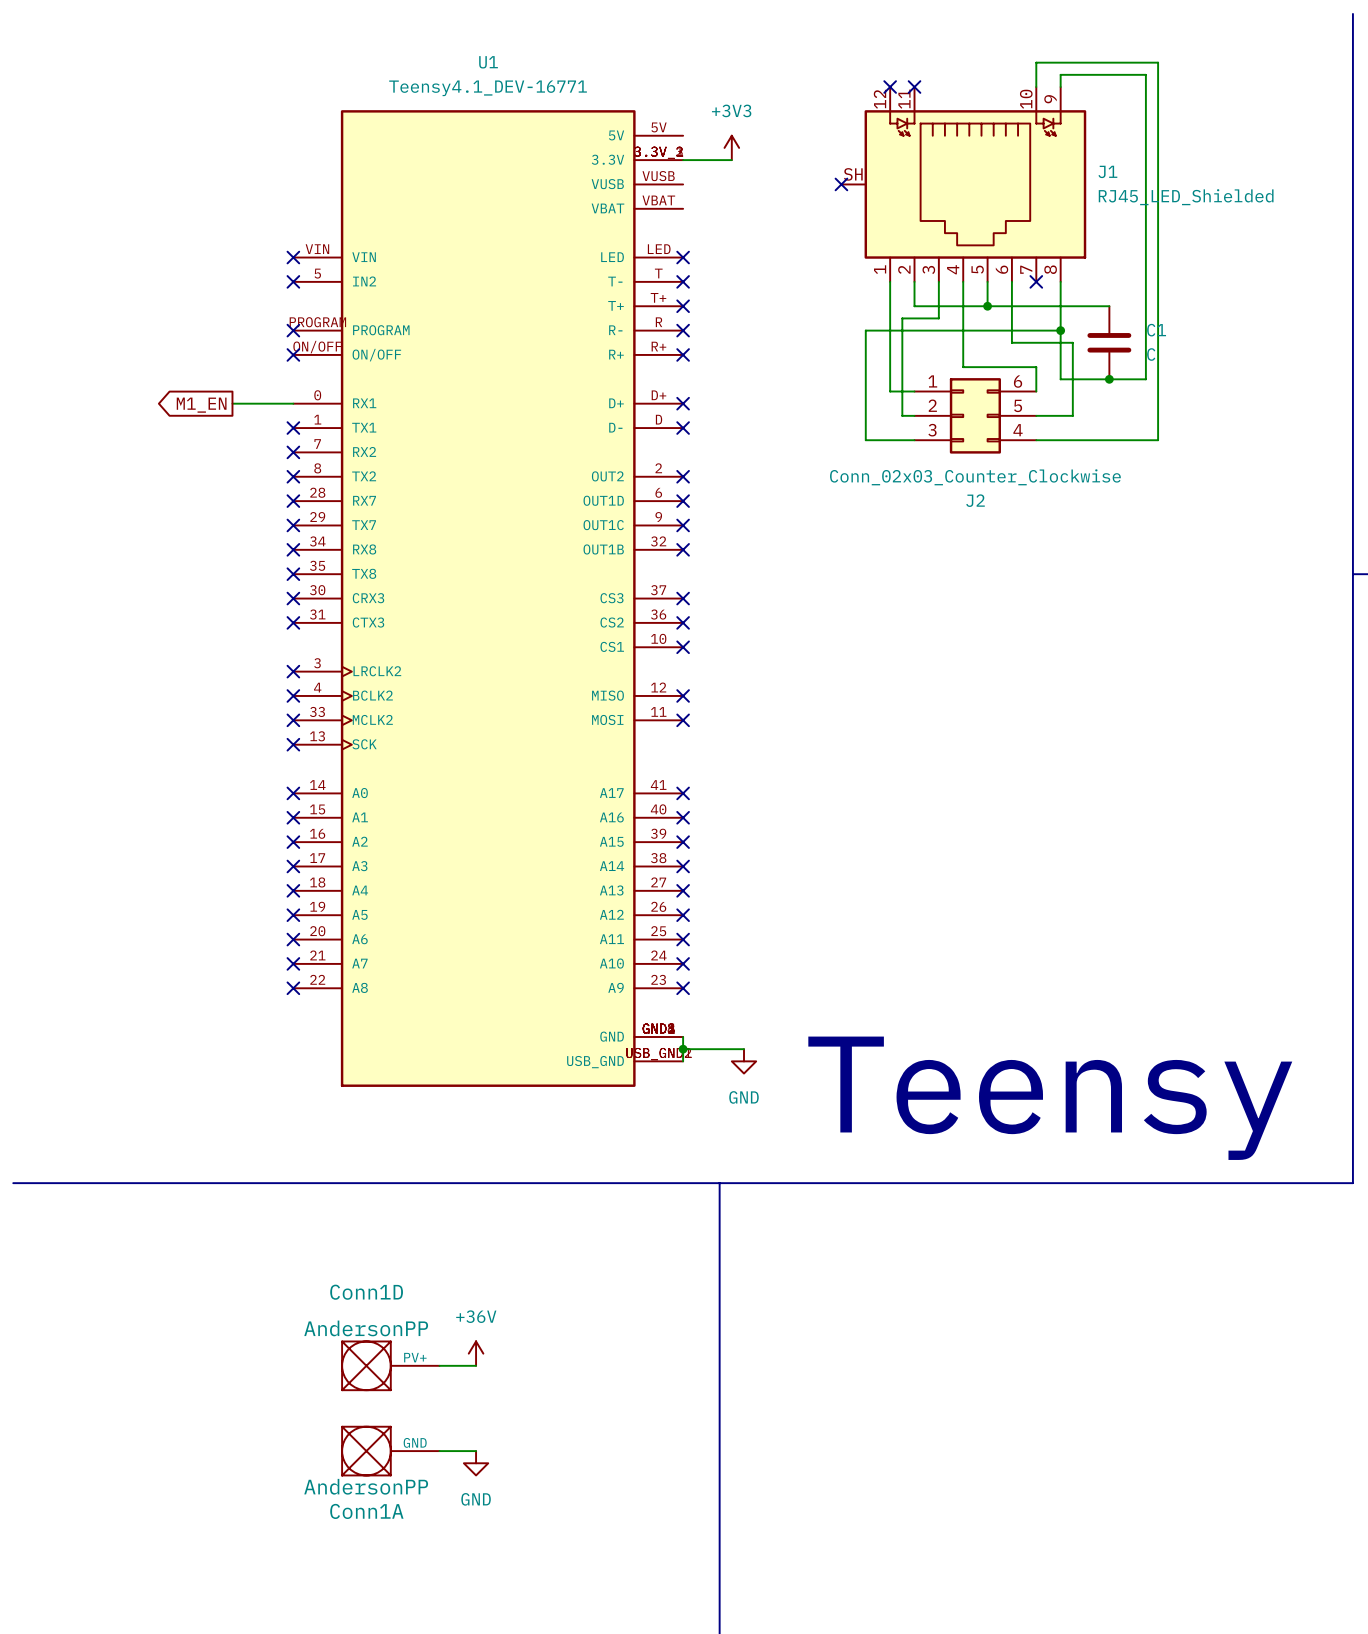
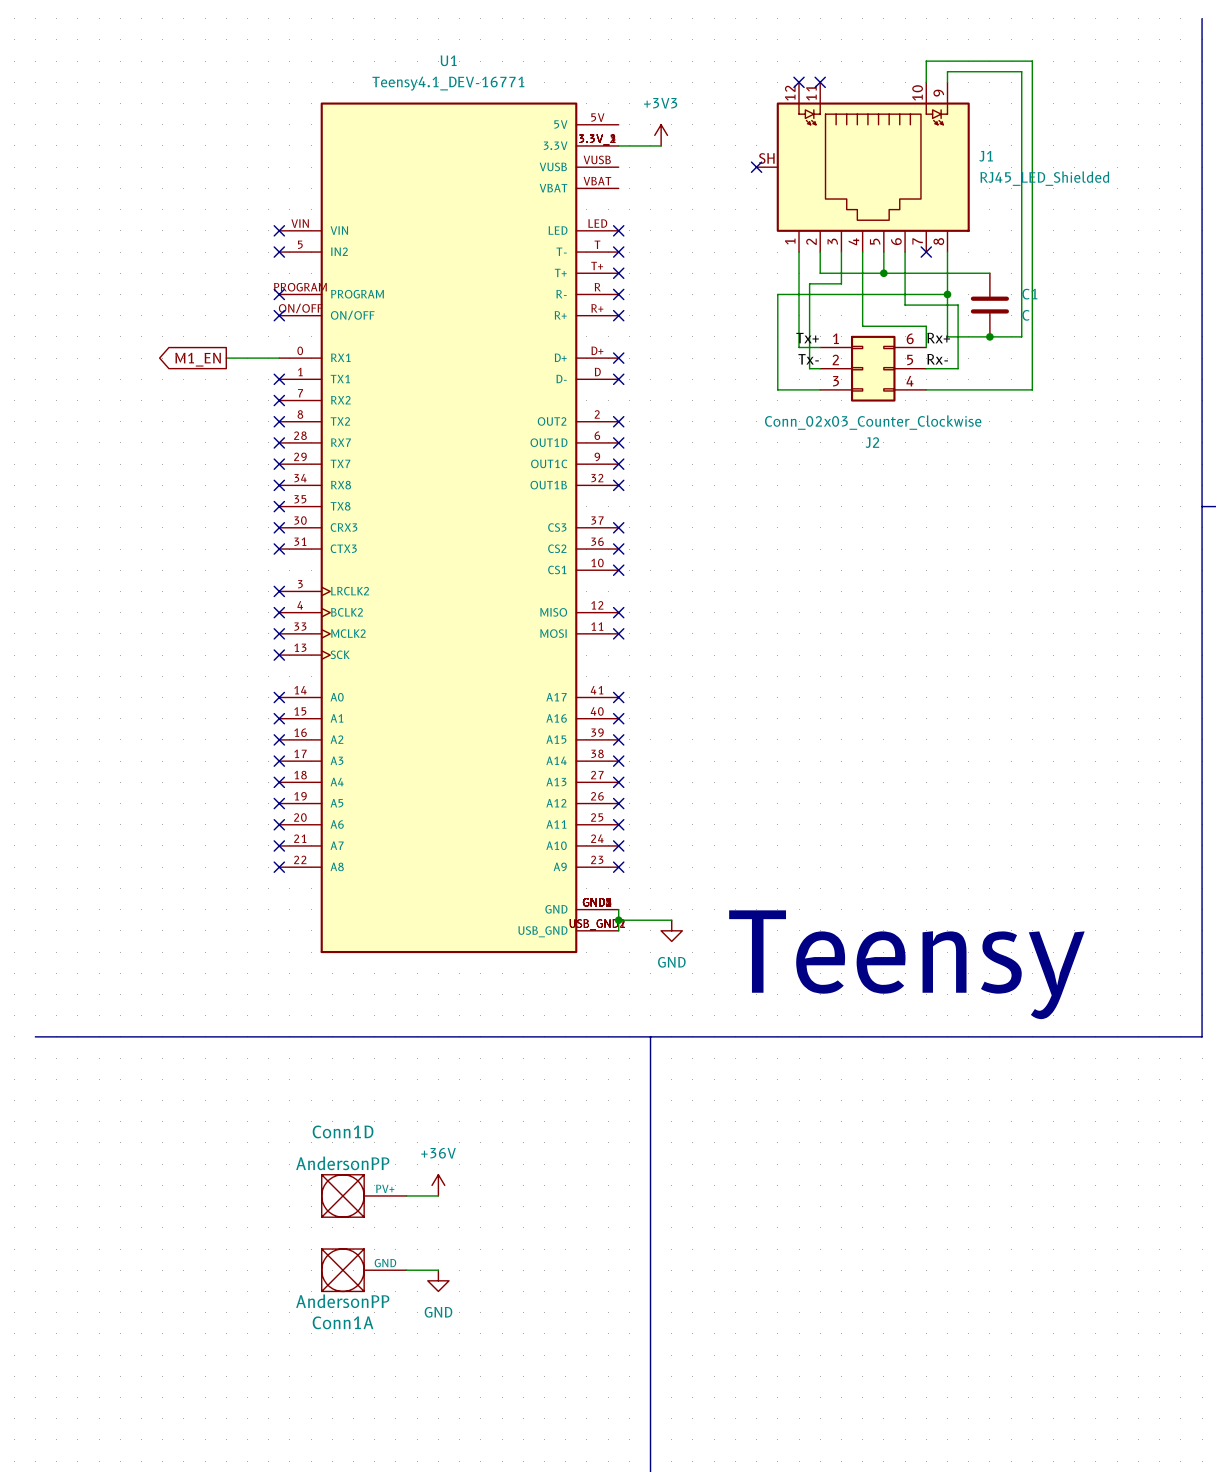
label: none -> Tx+ (807, 338)
label: none -> Rx+ (938, 338)
label: none -> Tx- (808, 359)
label: none -> Rx- (937, 359)

